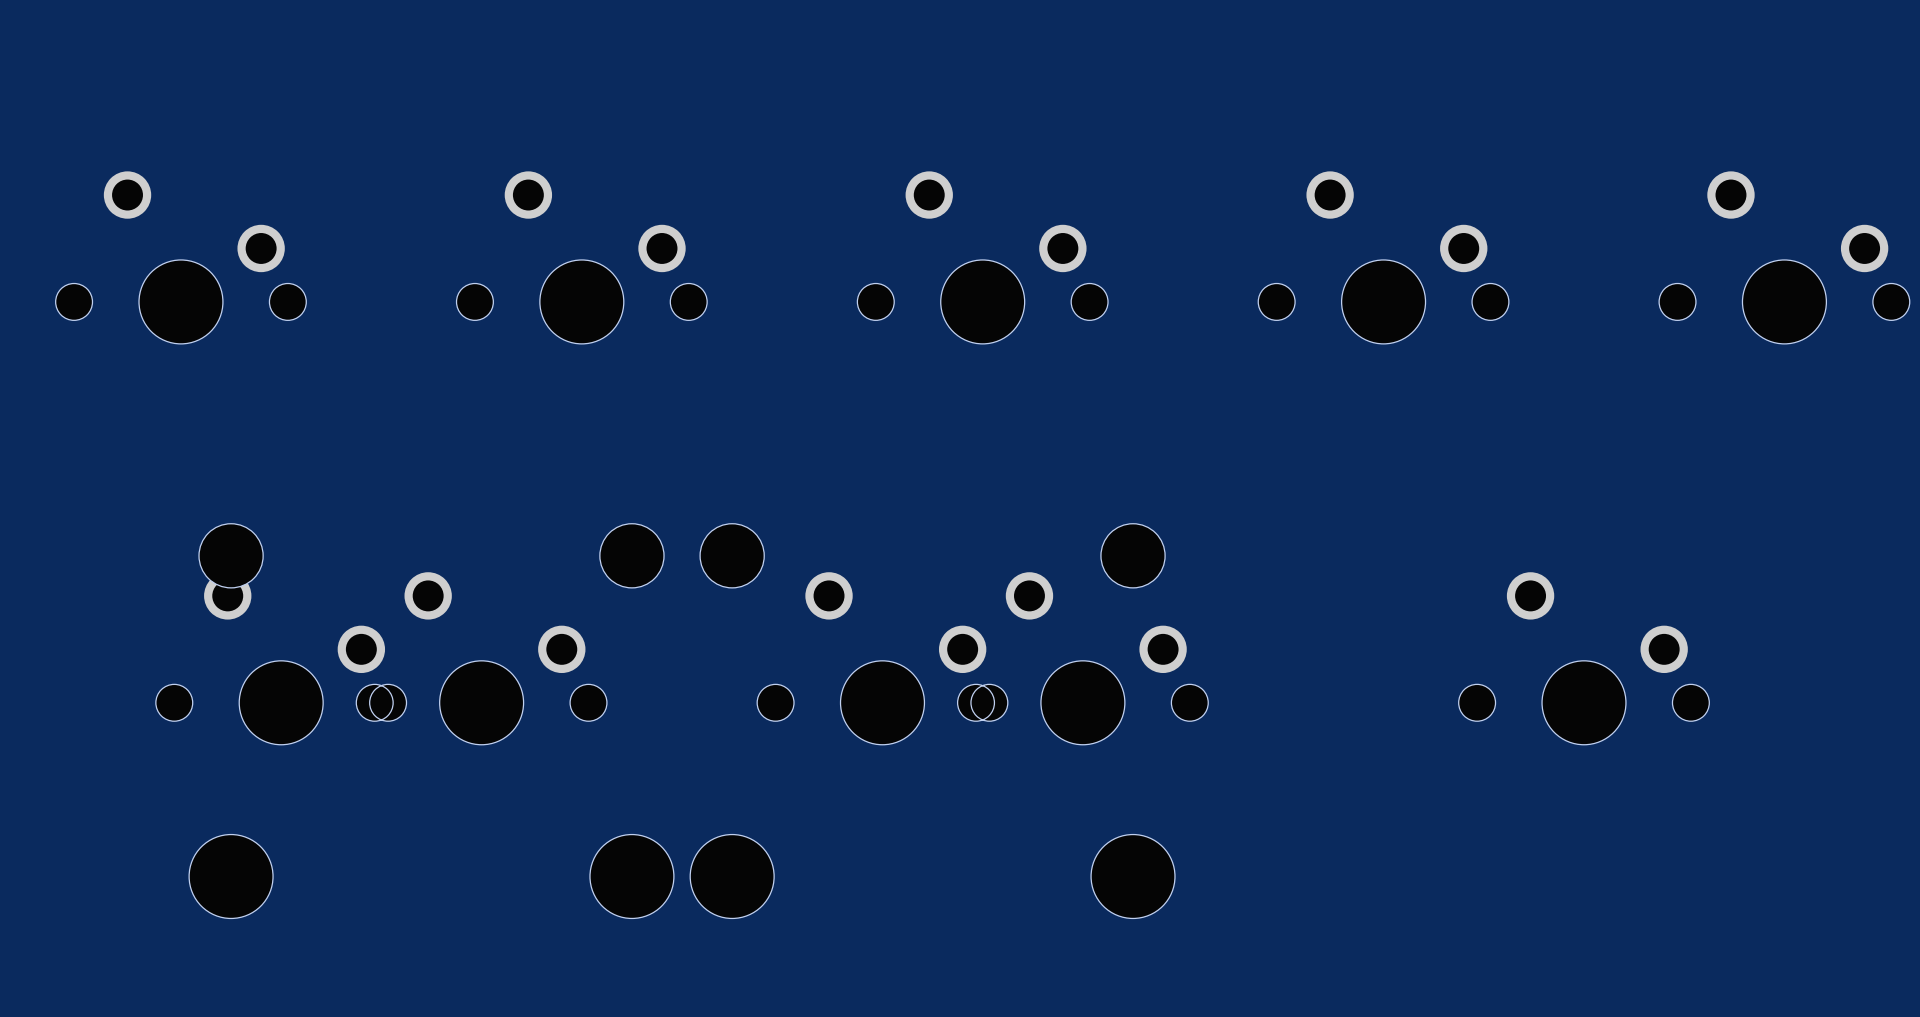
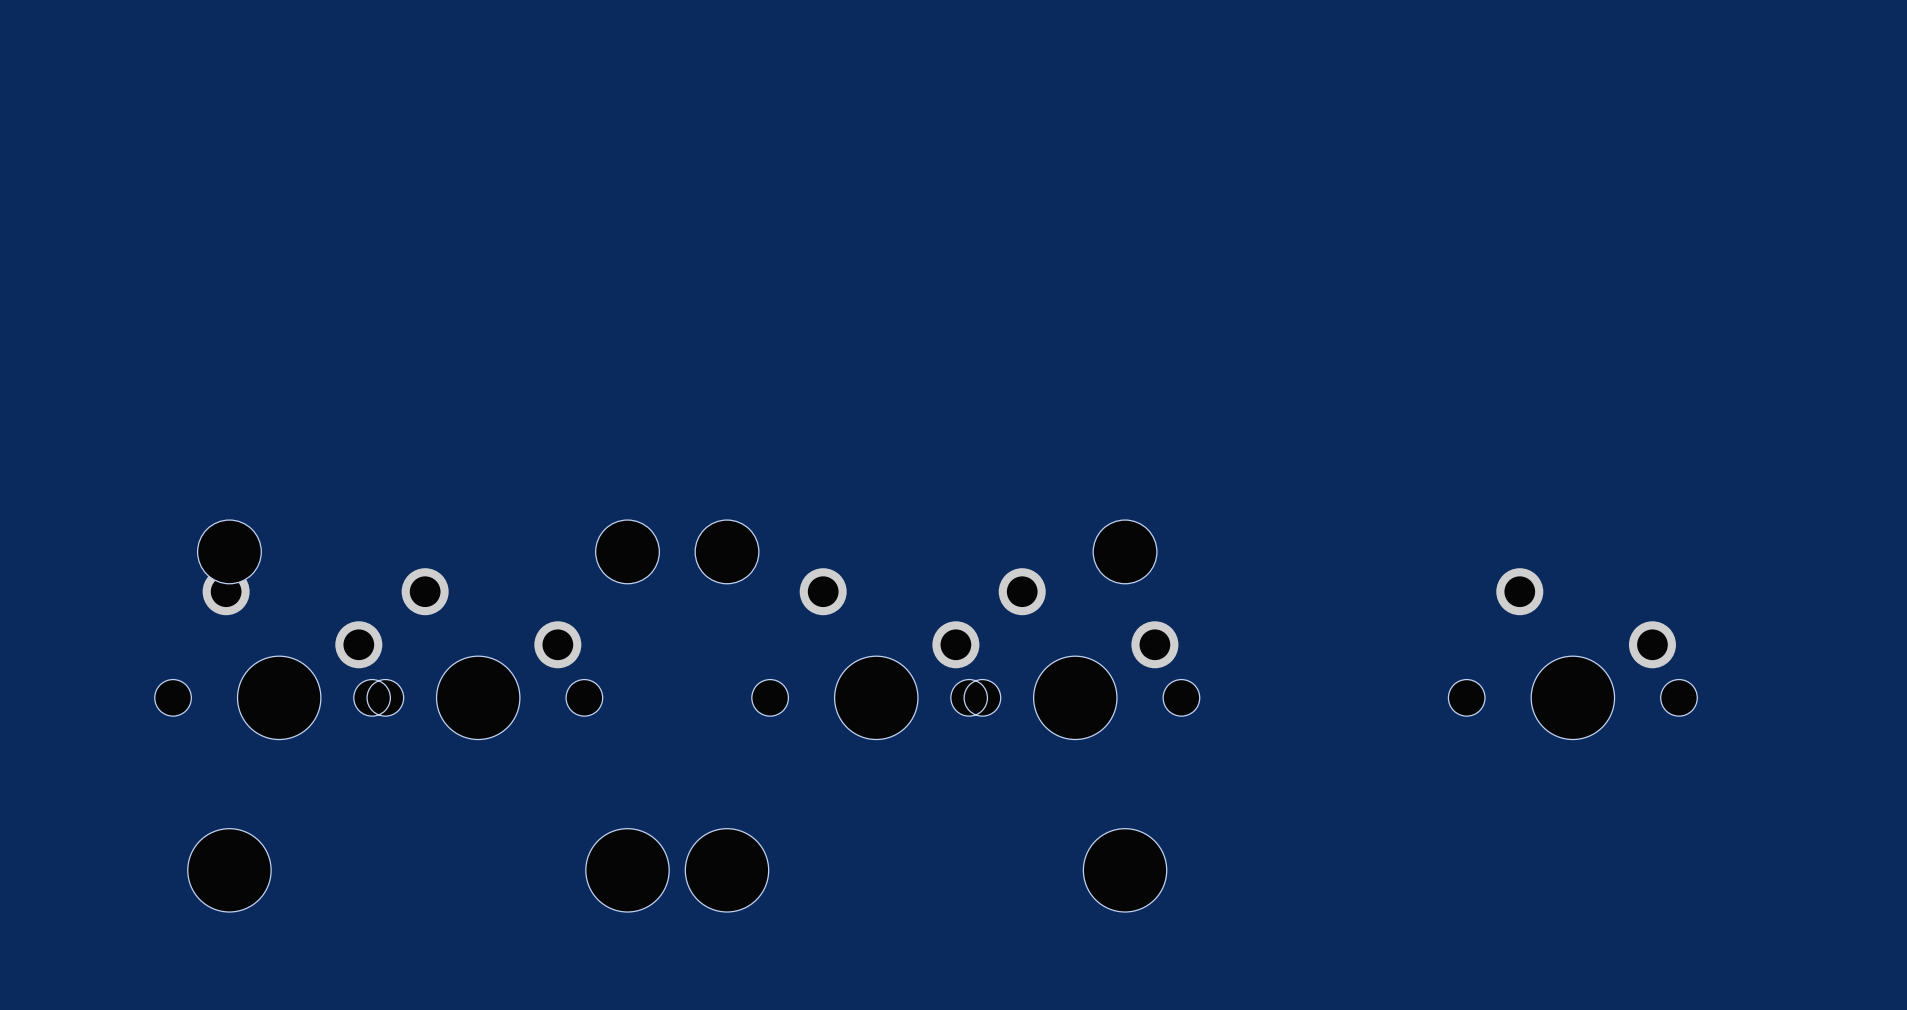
part: (180, 257) -> none
part: (581, 257) -> none
part: (982, 257) -> none
part: (1383, 257) -> none
part: (1784, 257) -> none

